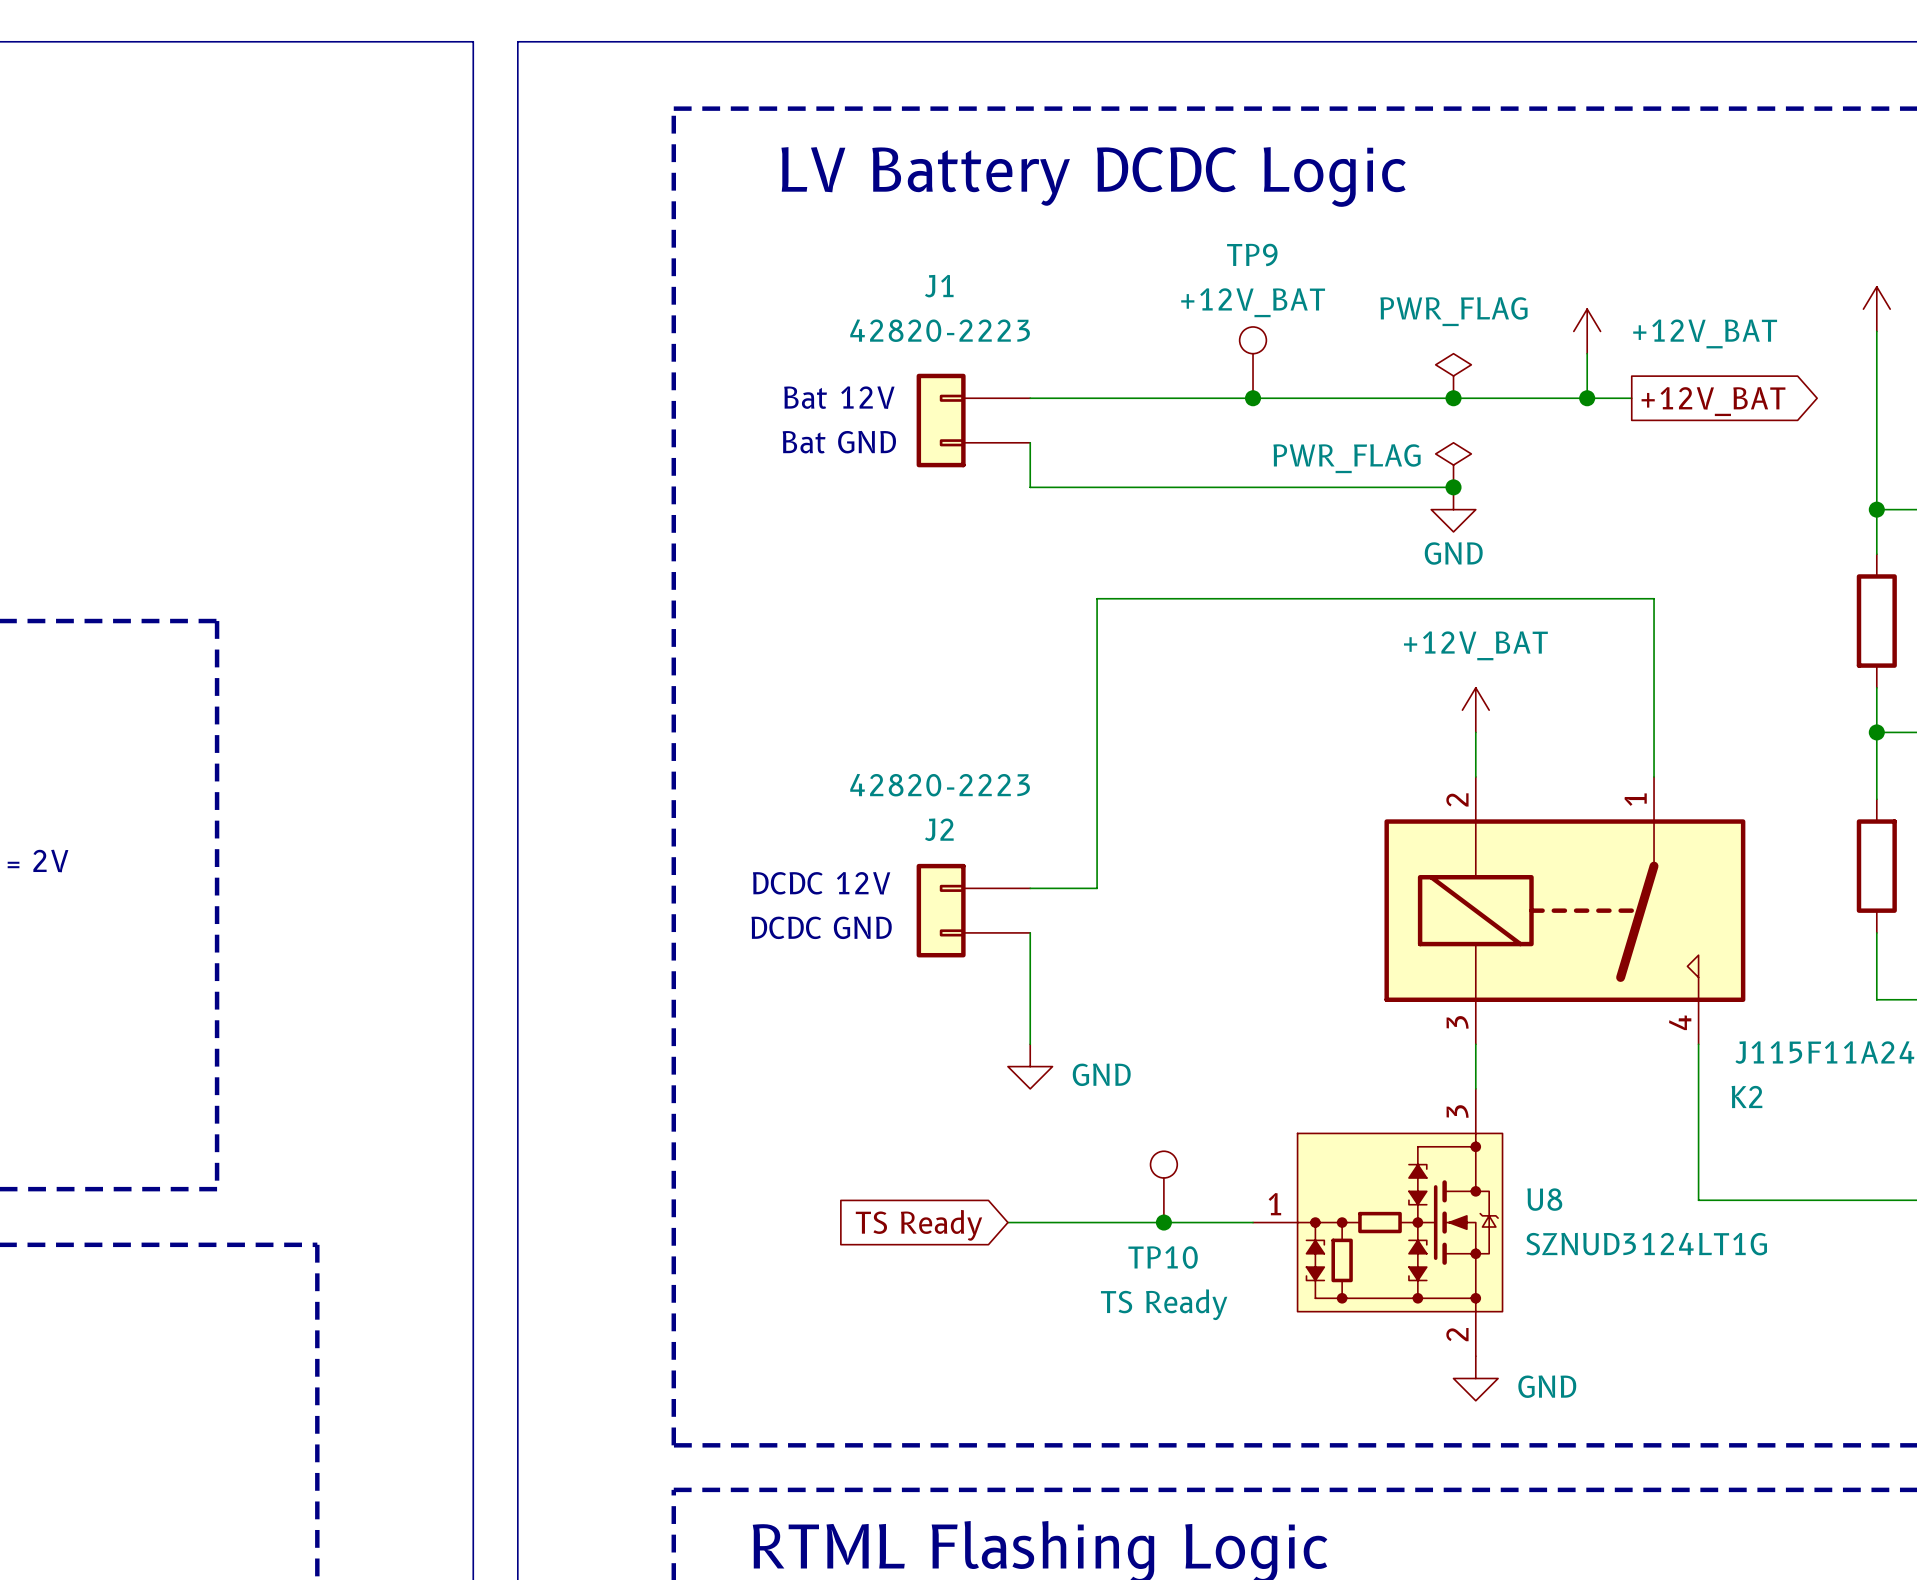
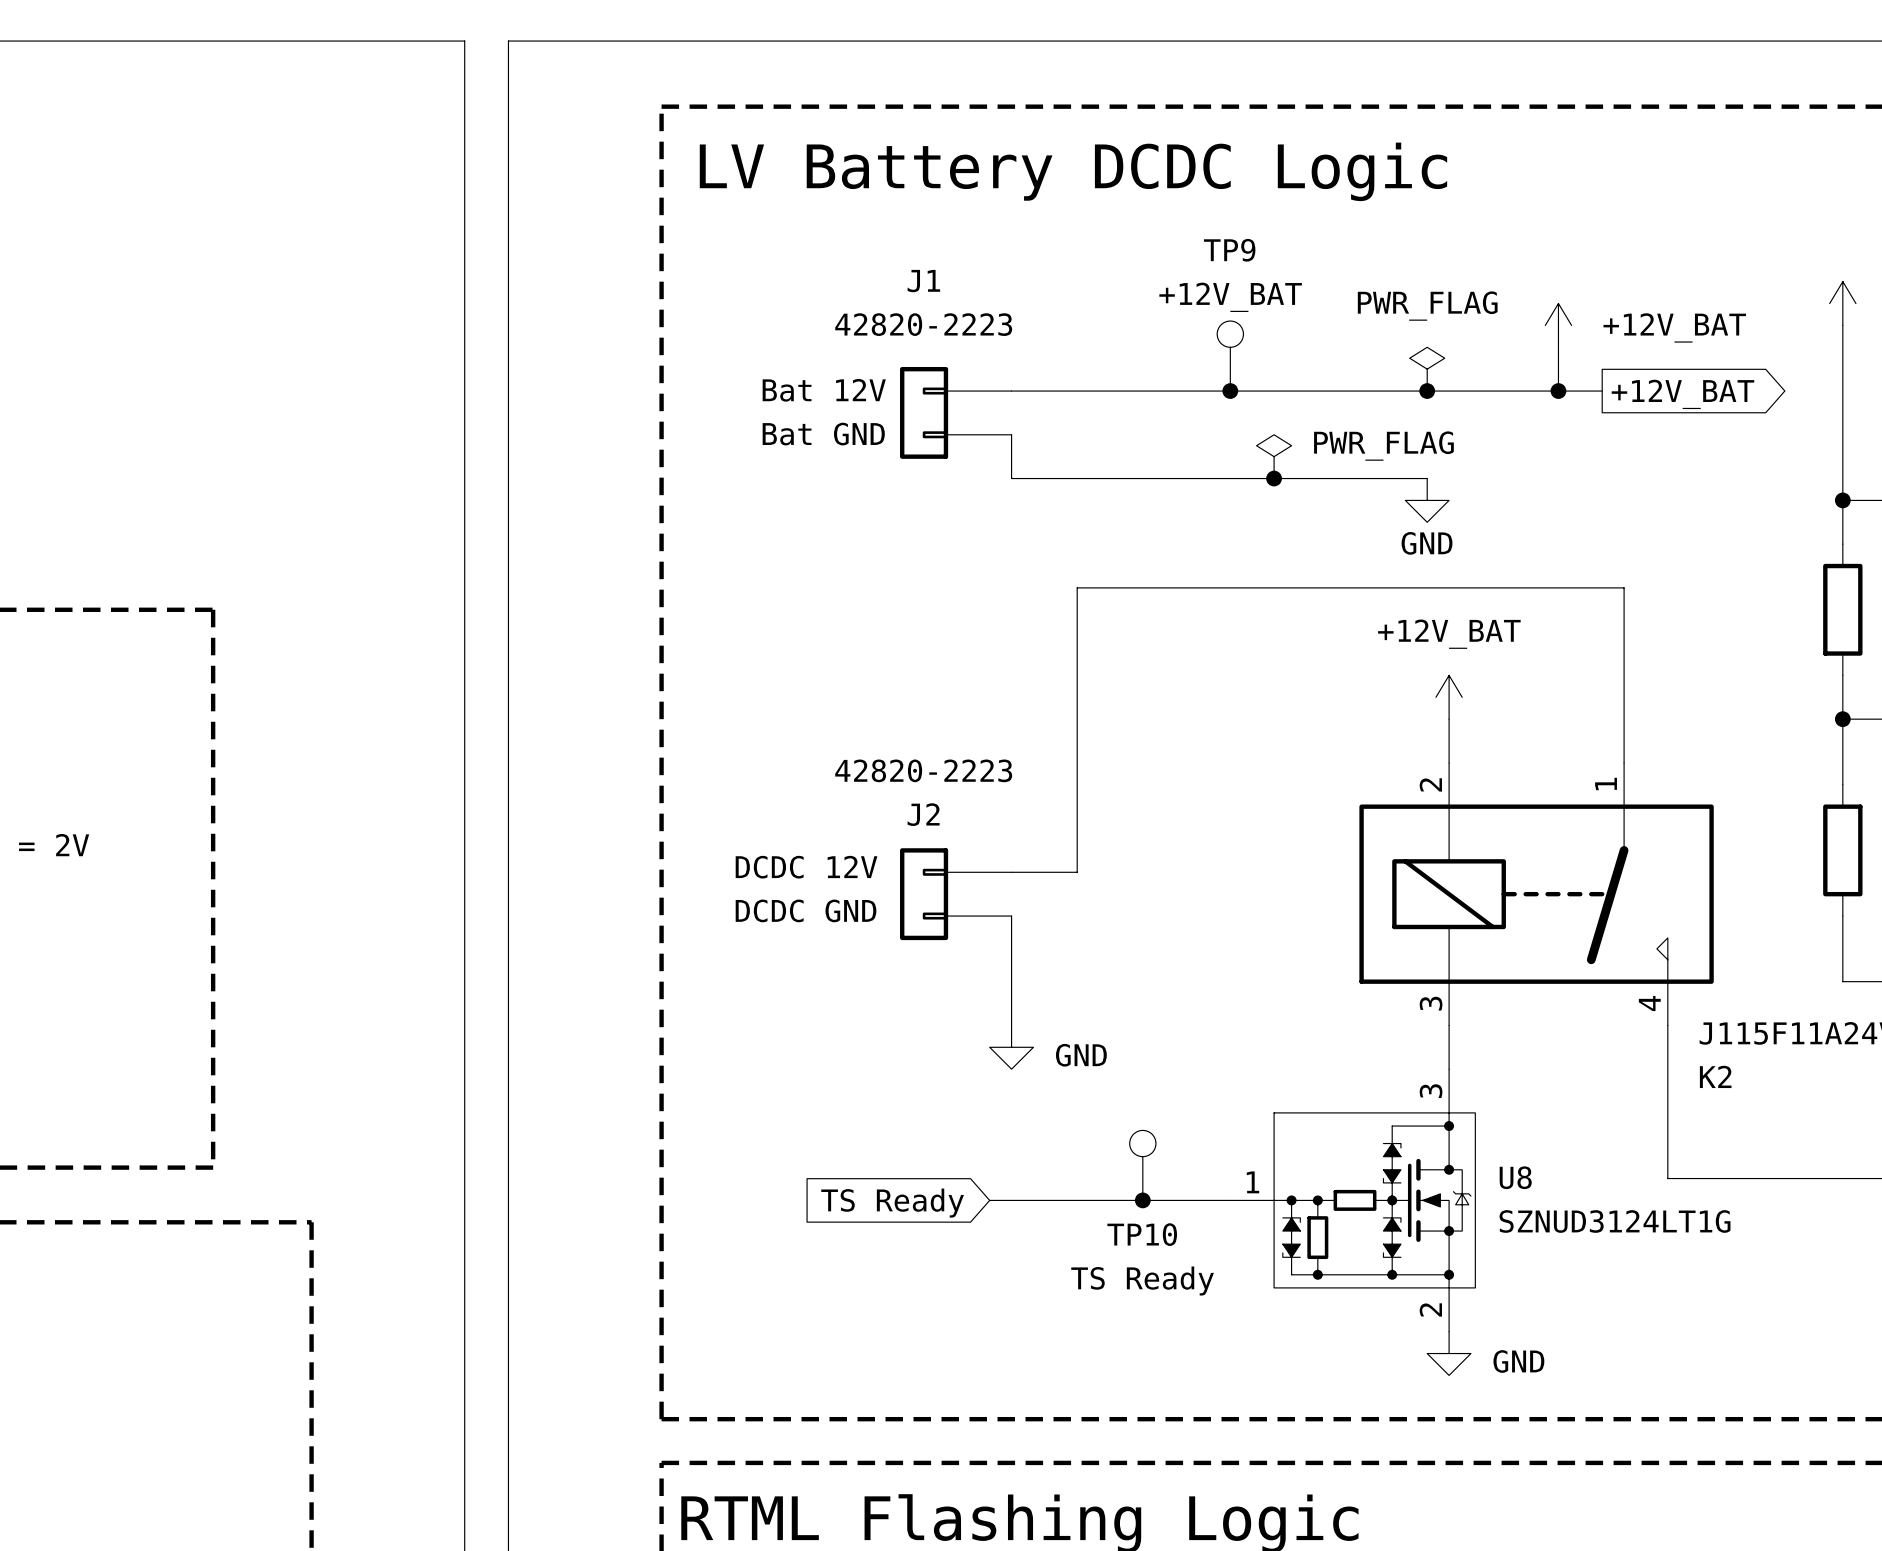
power symbol text position: PWR_FLAG (1346, 458) -> PWR_FLAG (1383, 446)
power symbol position: PWR_FLAG (1453, 465) -> PWR_FLAG (1274, 456)
junction: none -> (1274, 478)
junction: (1453, 487) -> none

